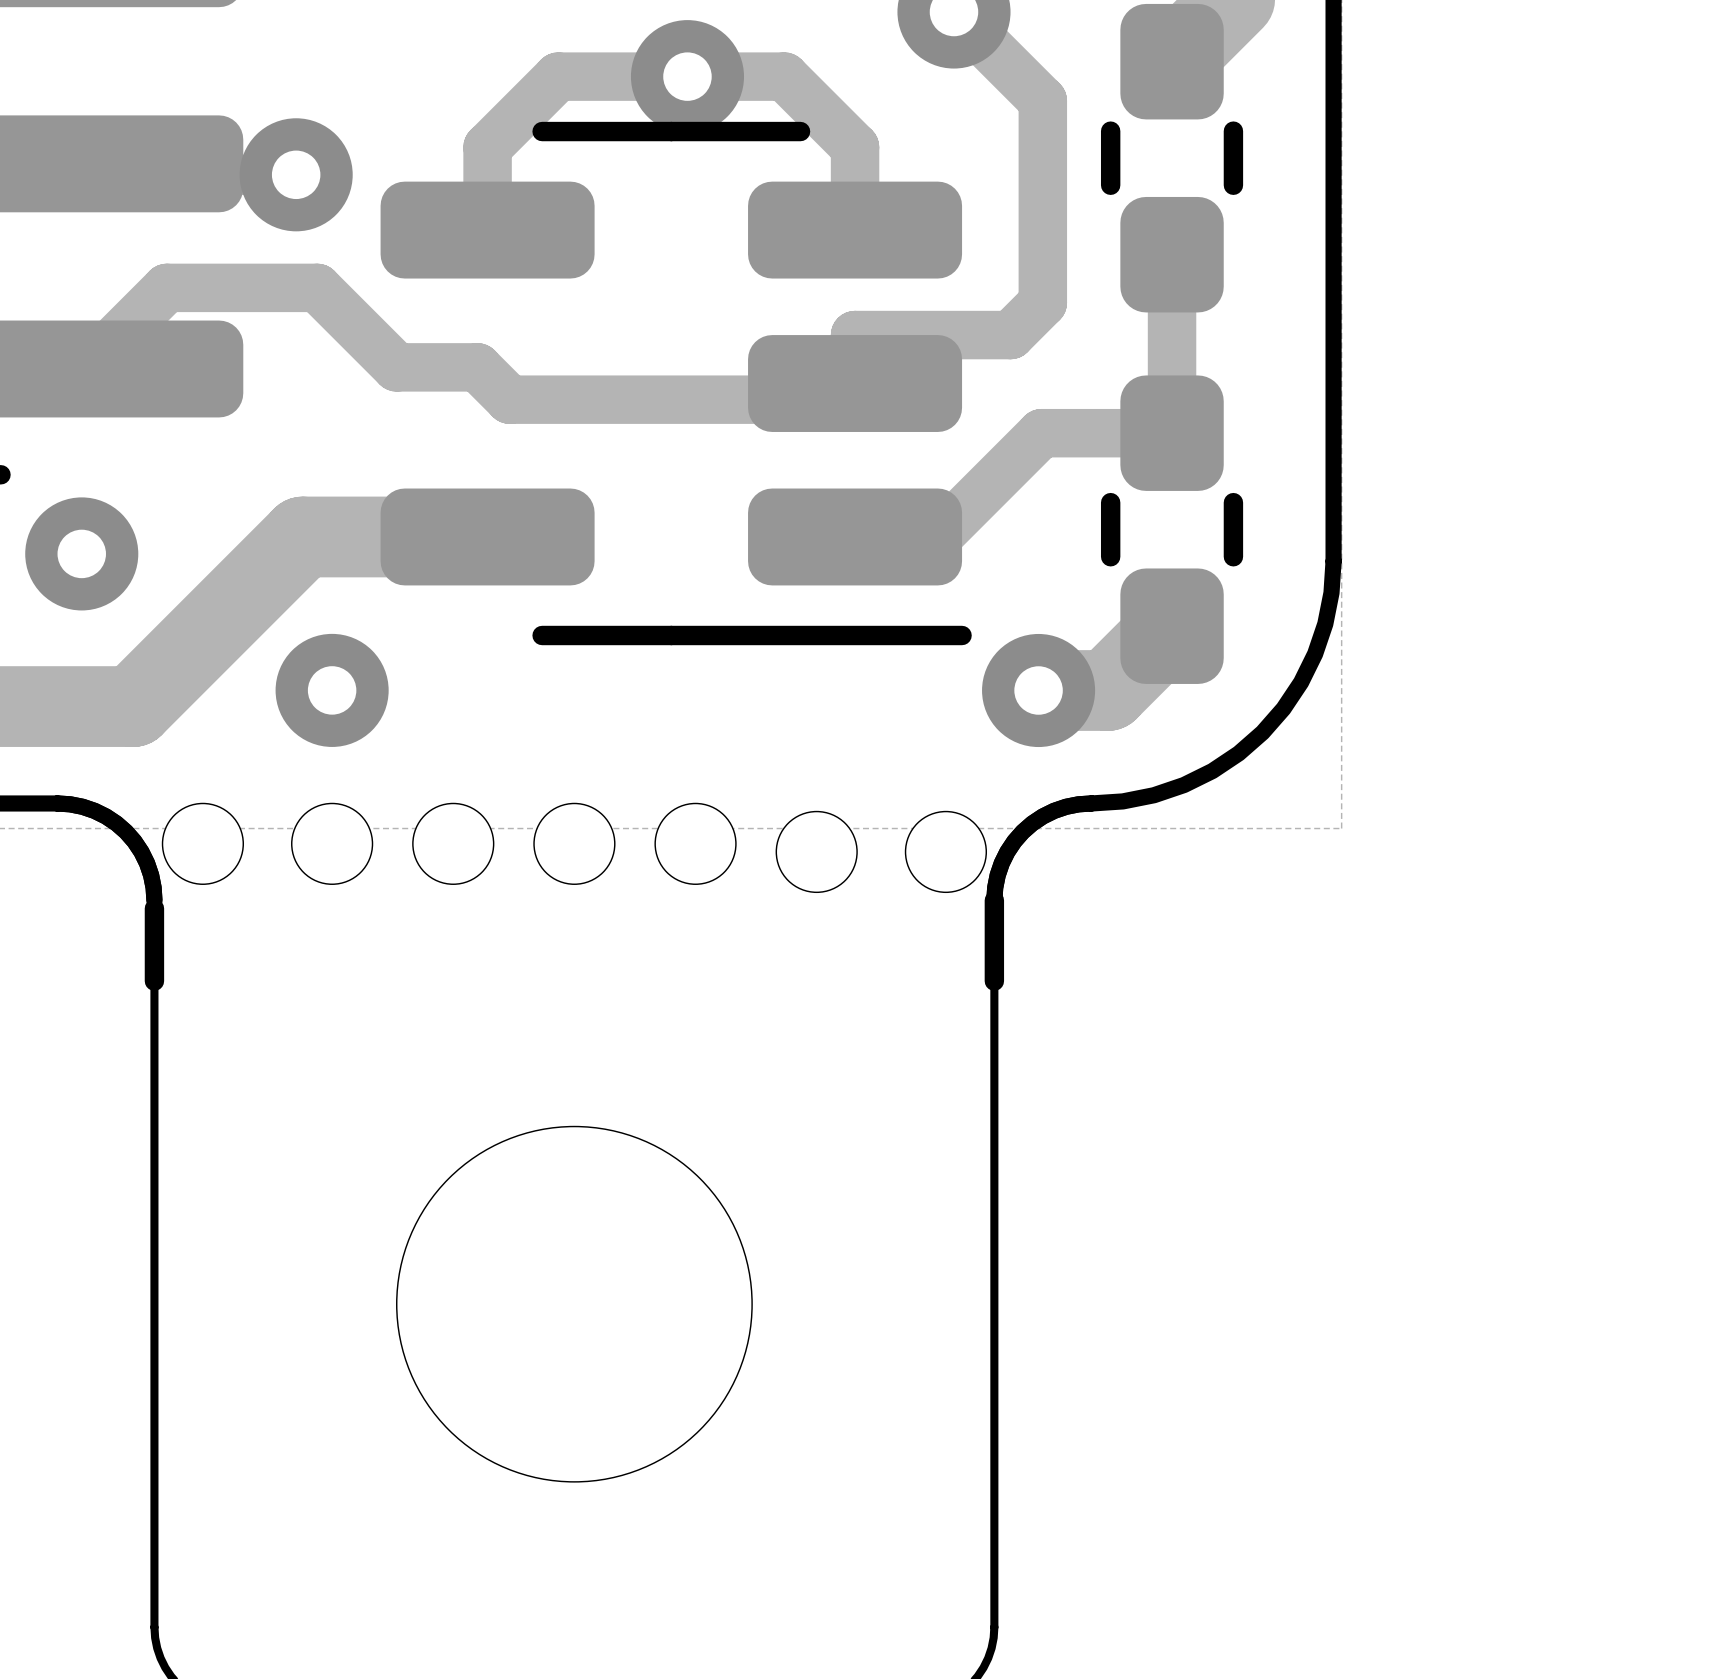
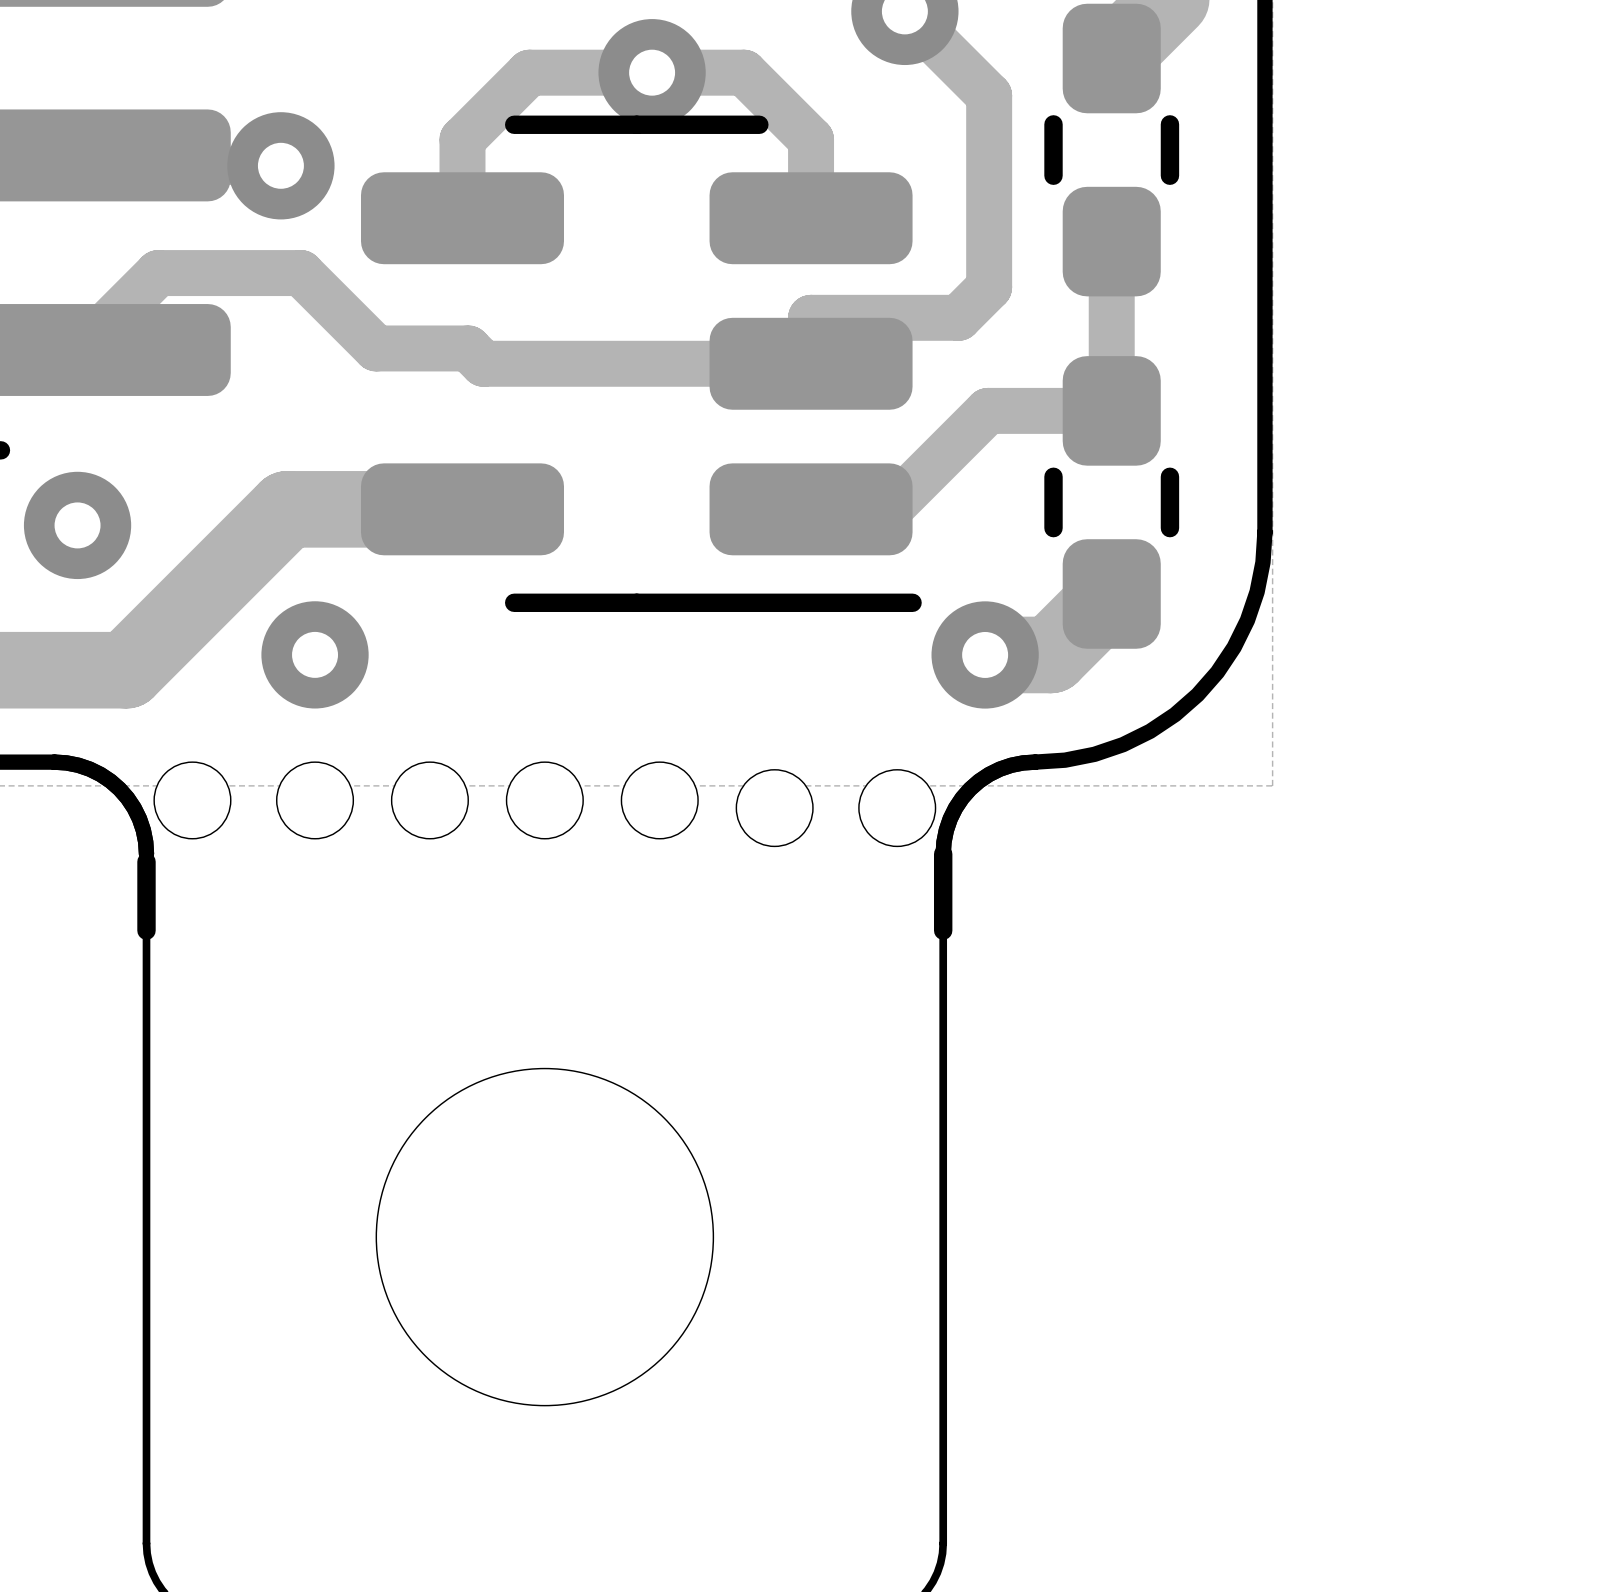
track: (477, 367) (509, 399) (838, 399) (855, 383) -> (452, 348) (468, 348) (483, 363) (811, 363)

